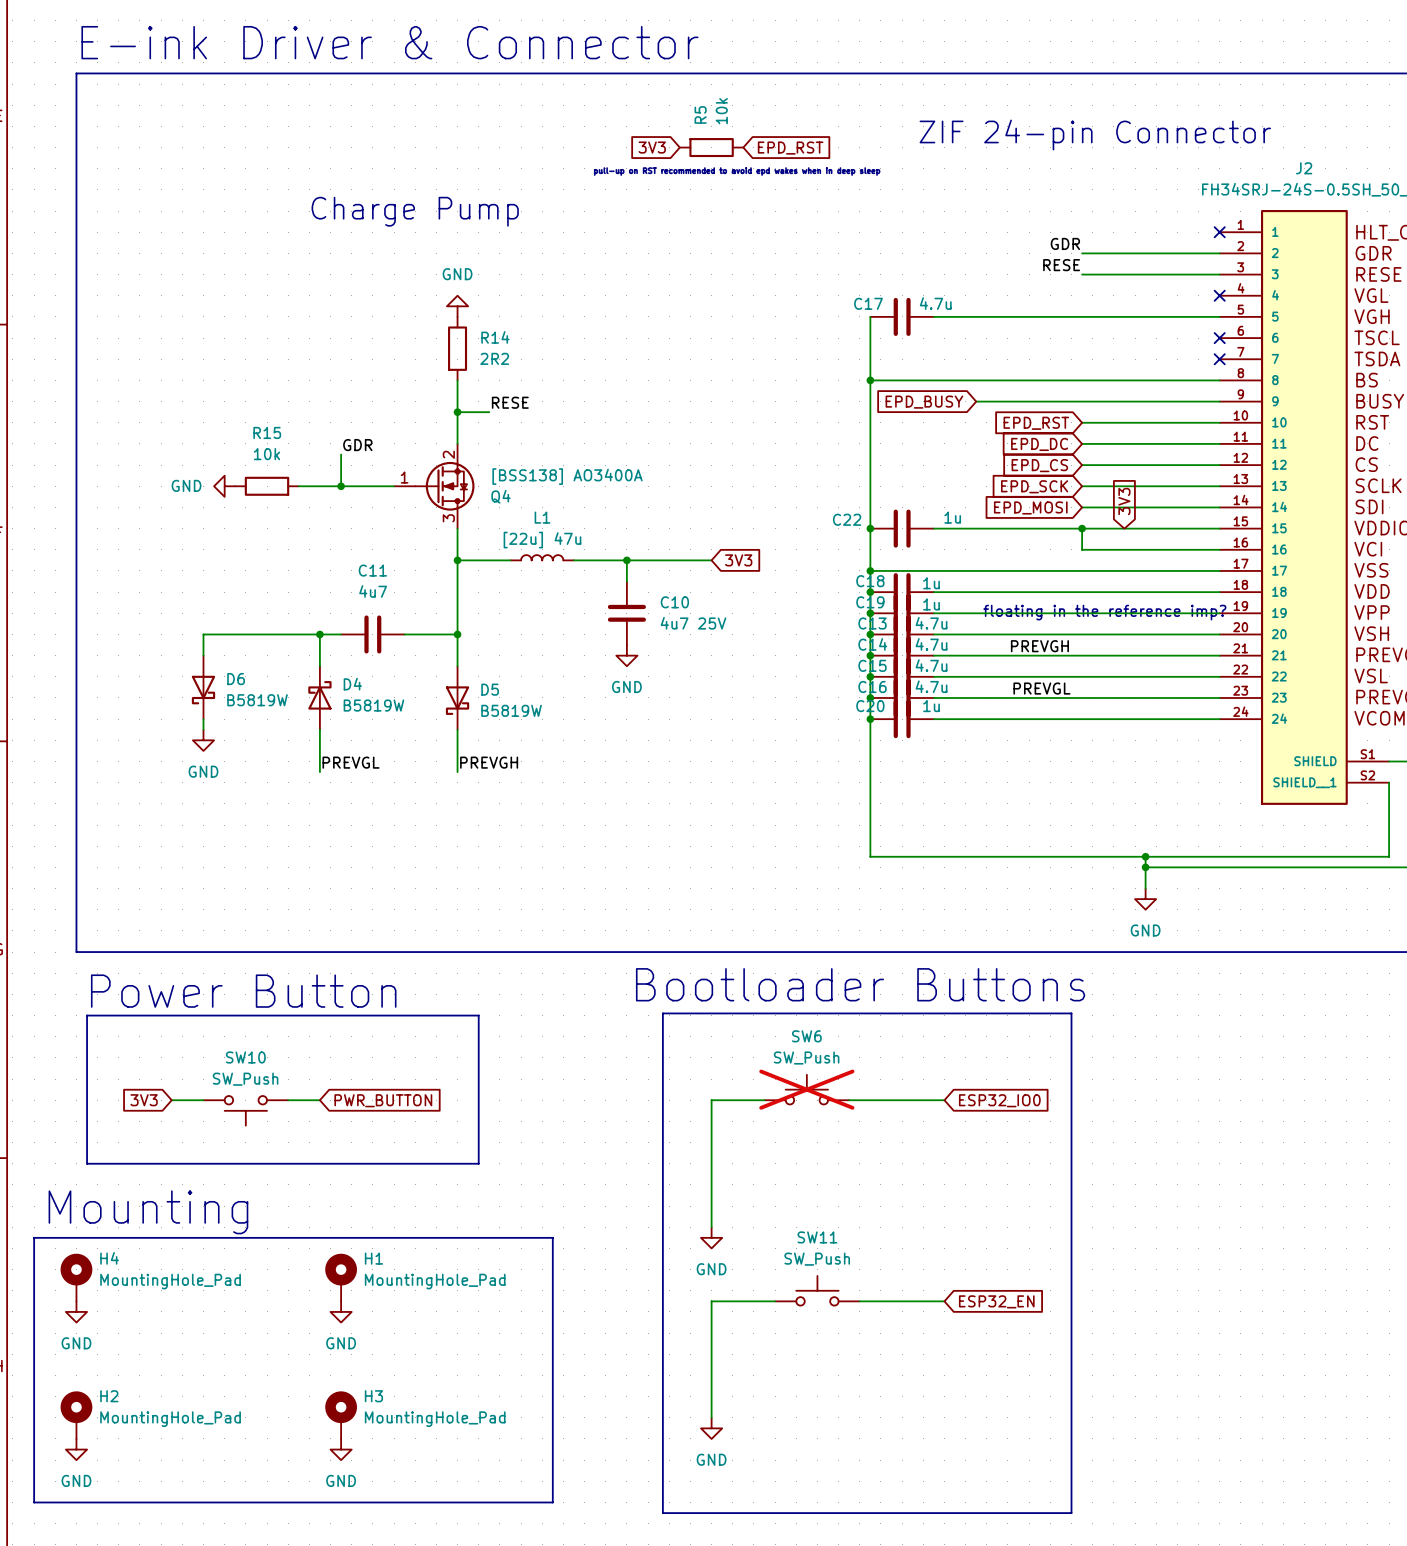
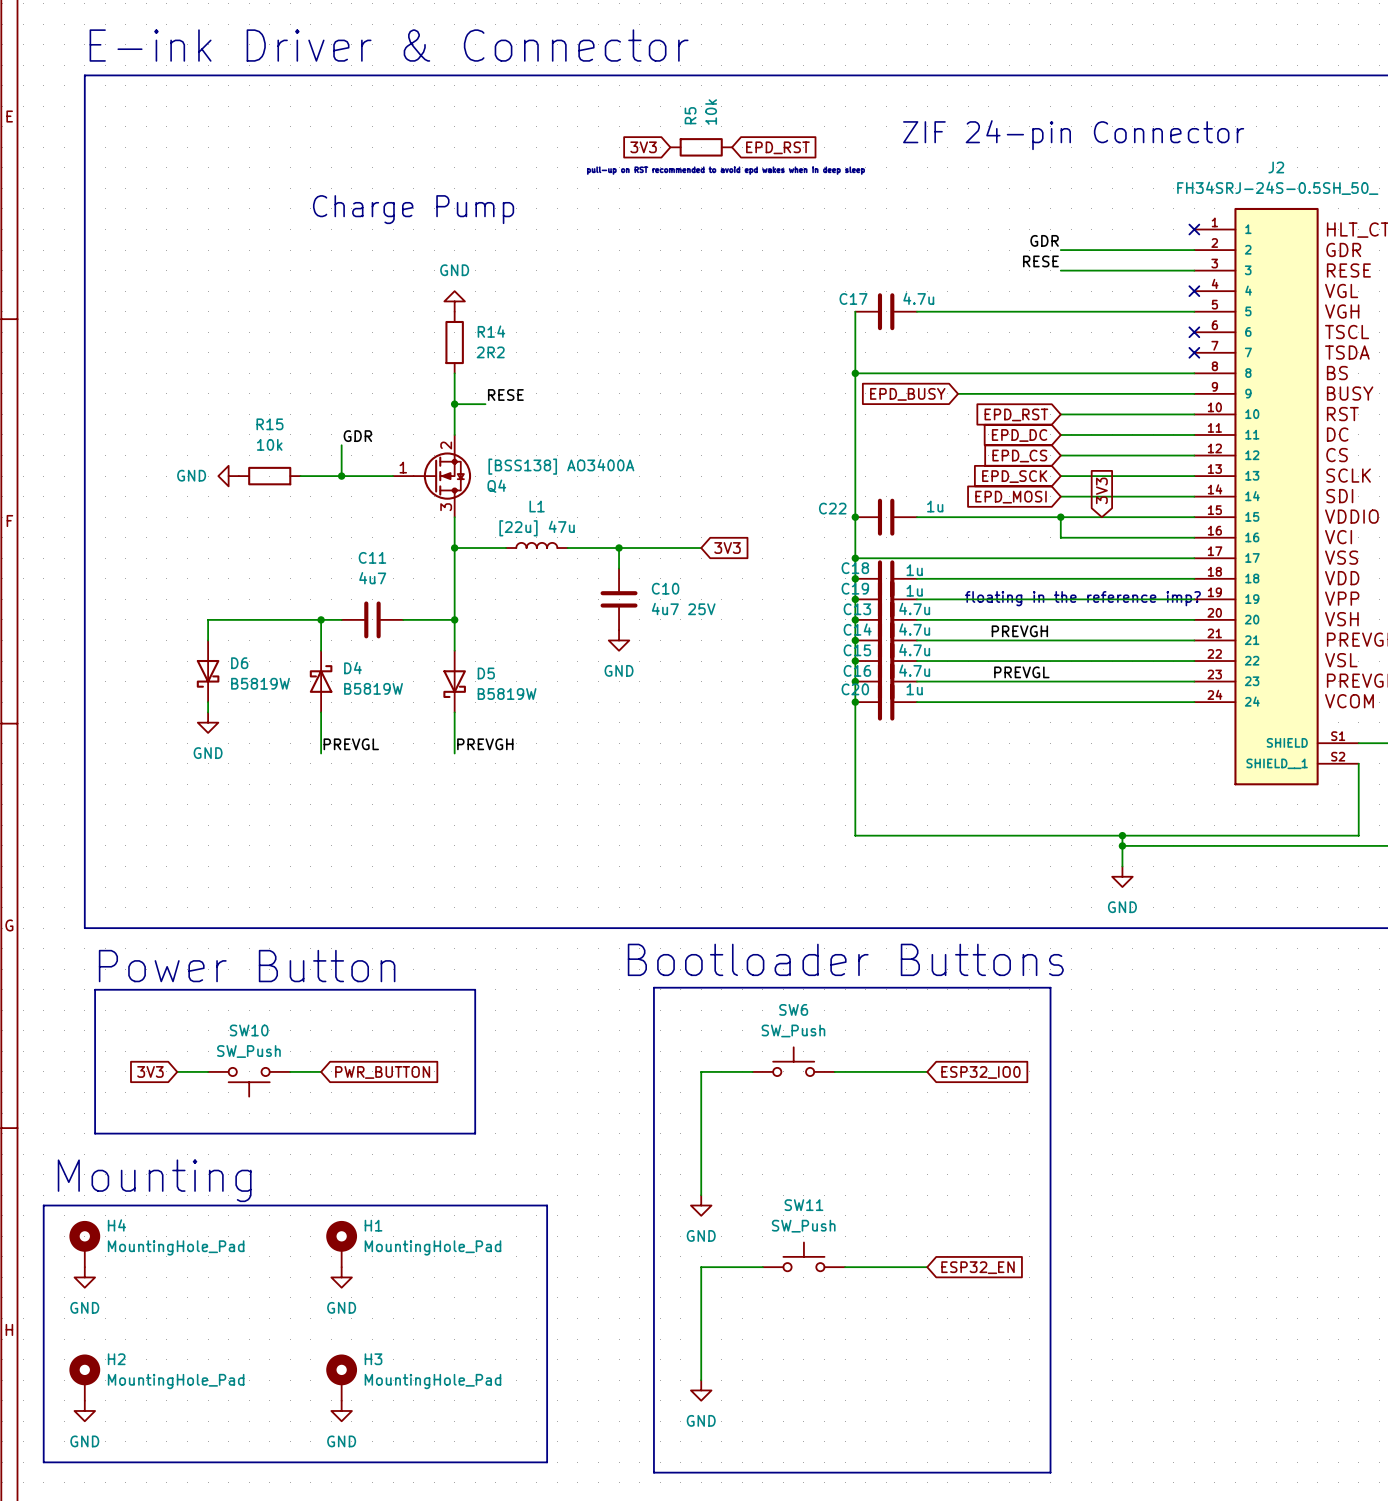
SW6 do-not-place cross: (806, 1089) -> none

